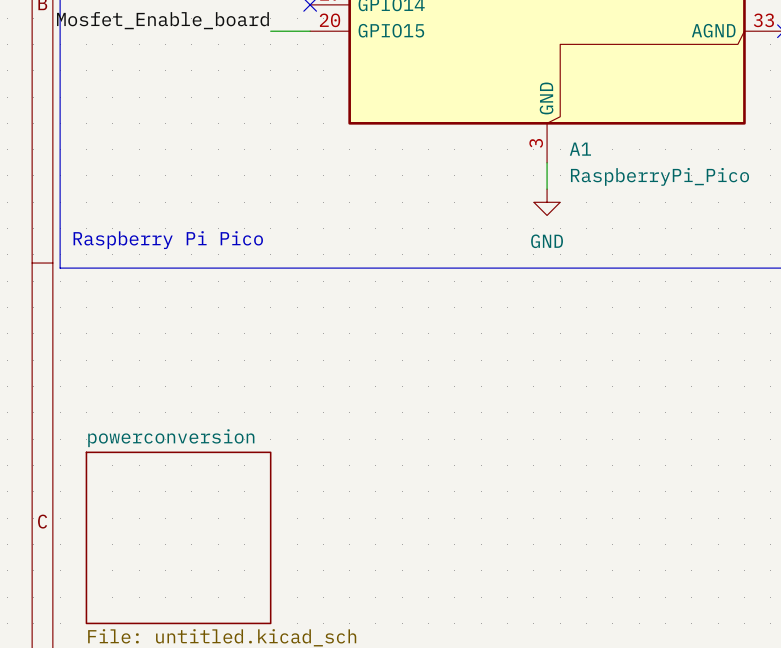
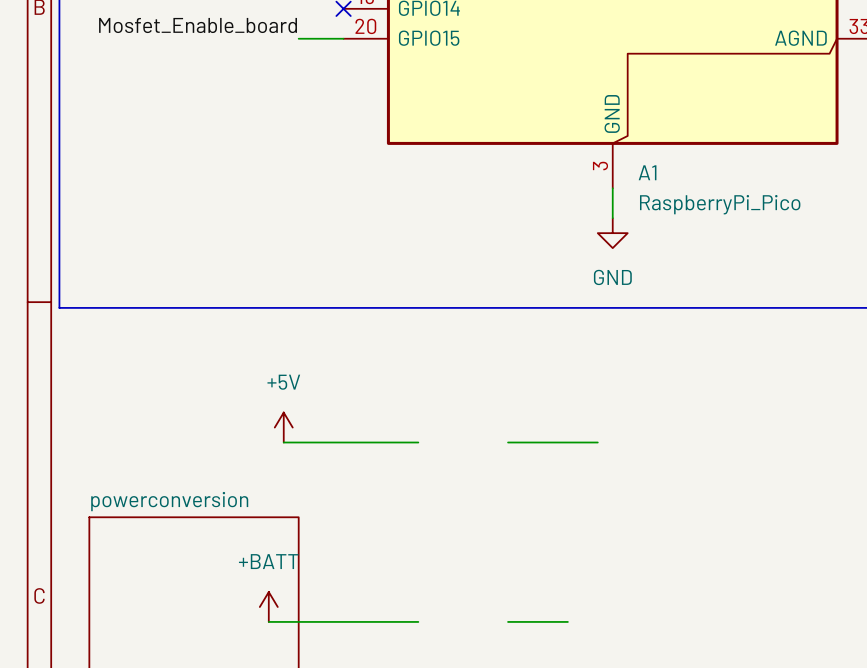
text: Raspberry Pi Pico (168, 240) -> none
power symbol: none -> +5V (283, 427)
wire: none -> (283, 442) (418, 442)
wire: none -> (508, 442) (597, 442)
power symbol: none -> +BATT (268, 607)
wire: none -> (268, 621) (418, 621)
wire: none -> (508, 621) (567, 621)

